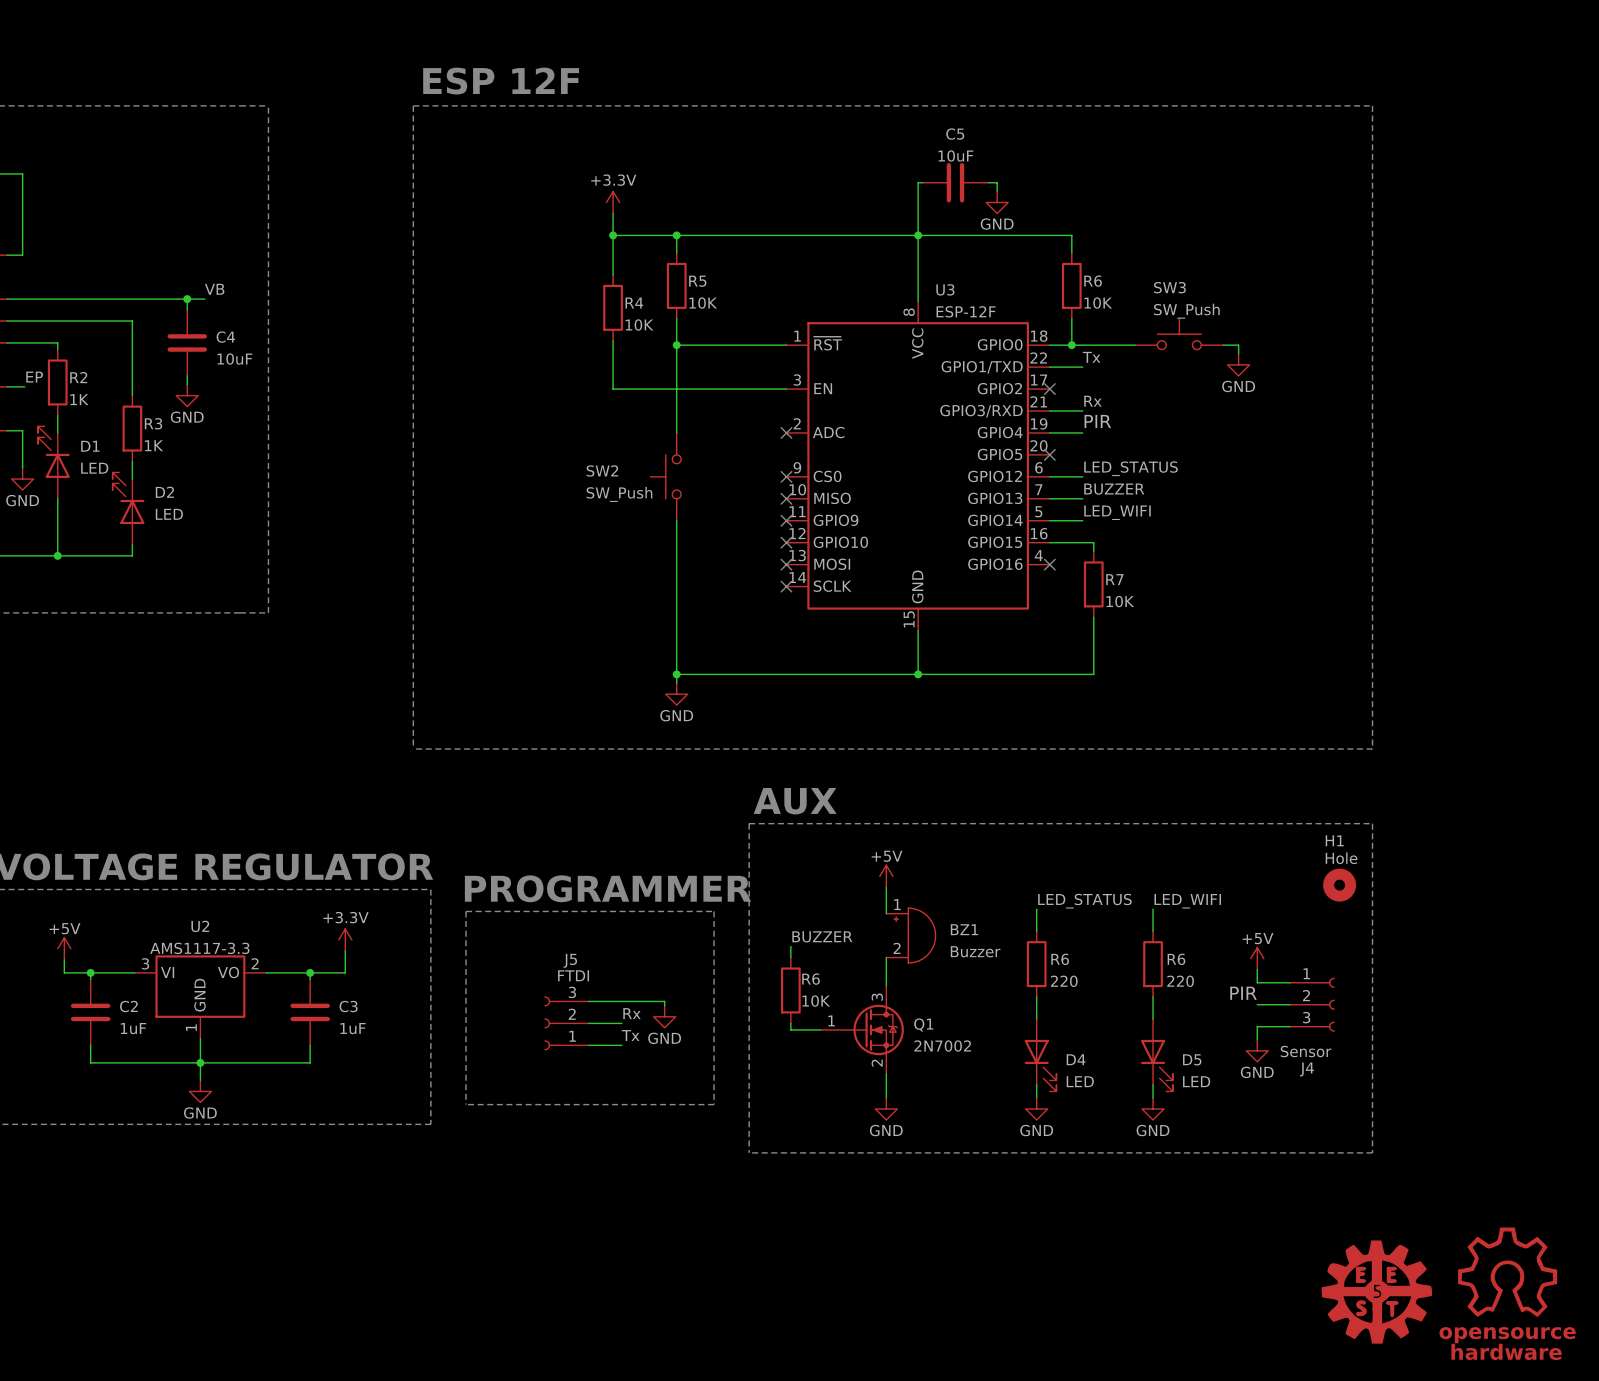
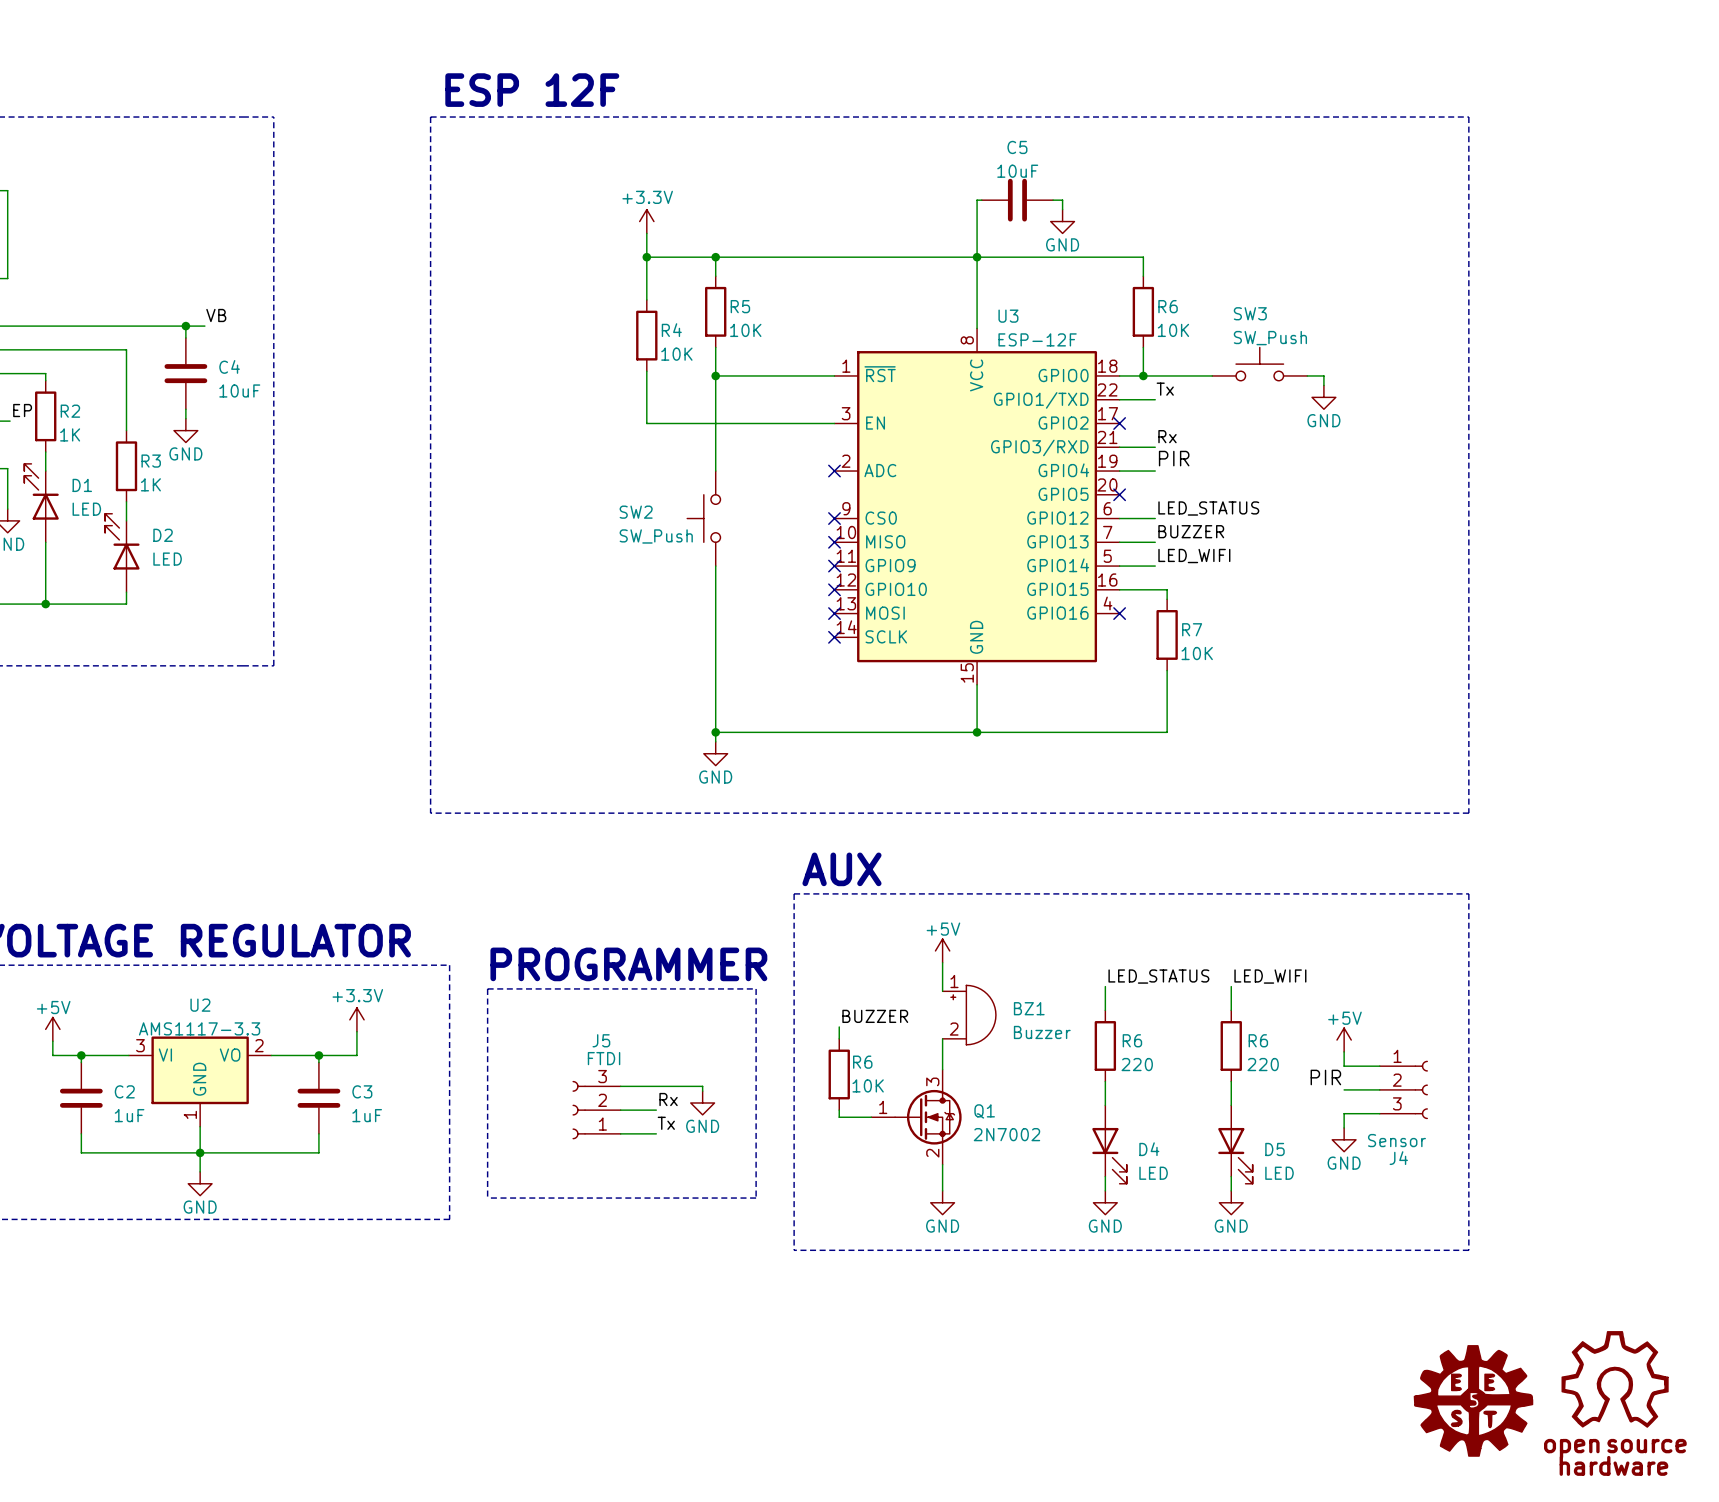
H1: Hole (1339, 885) -> none

